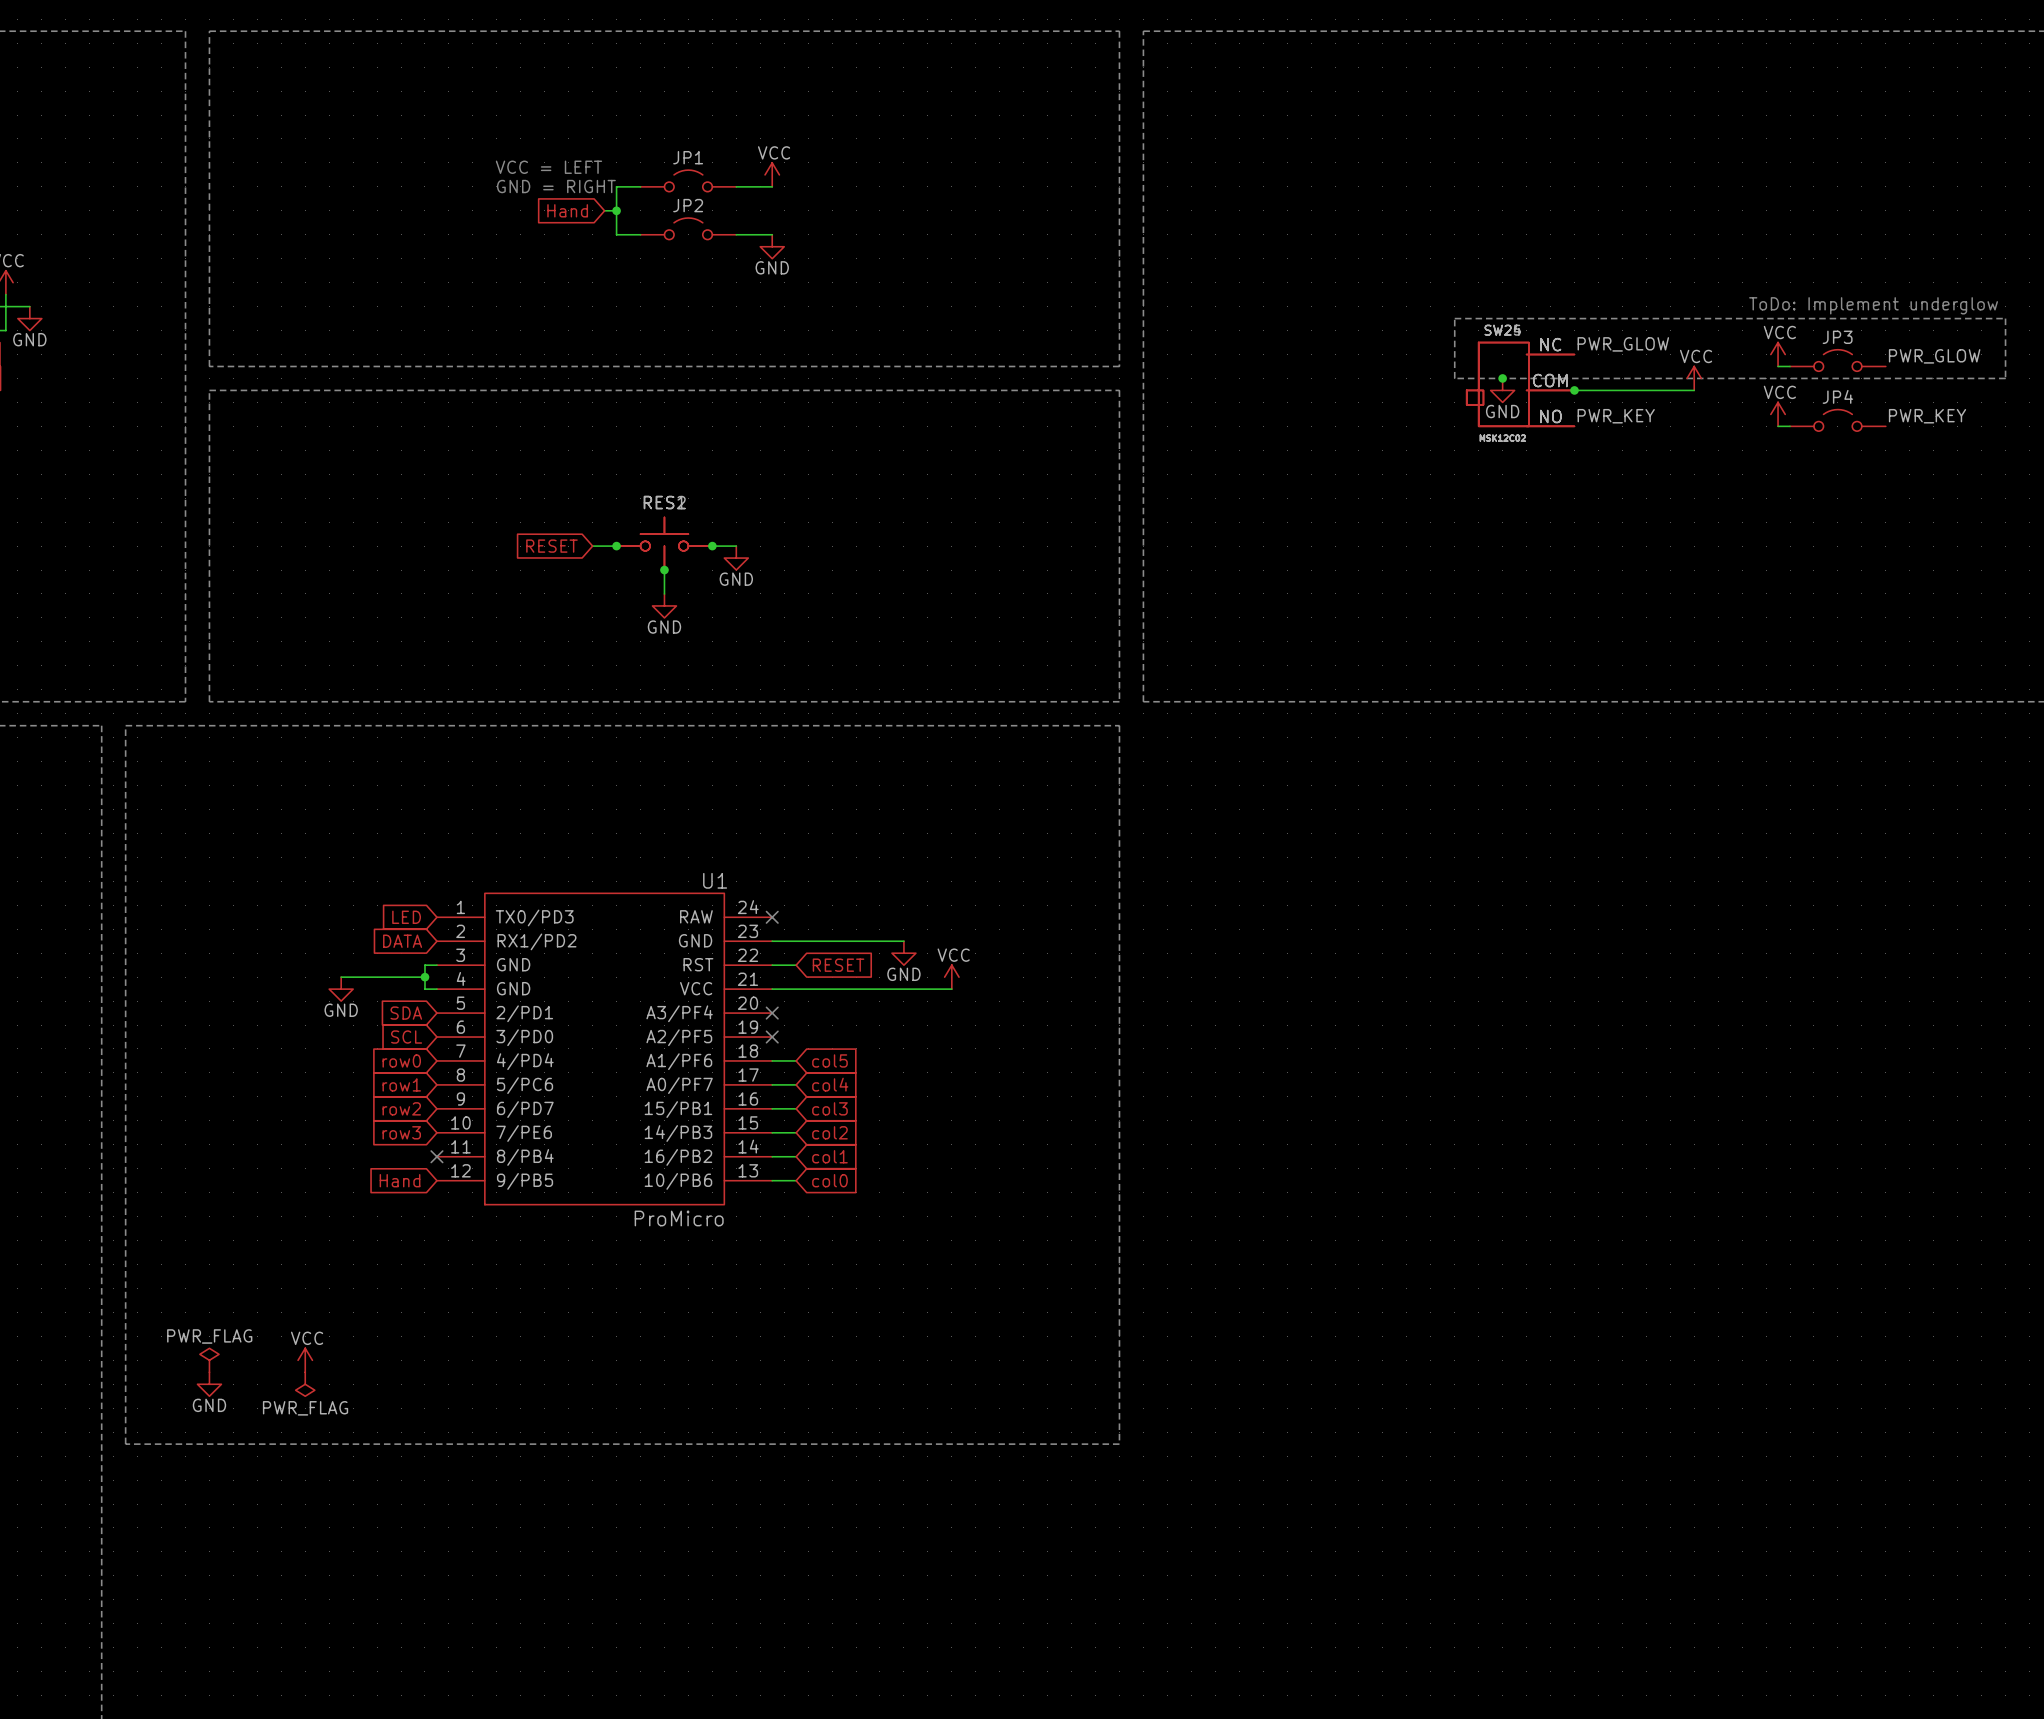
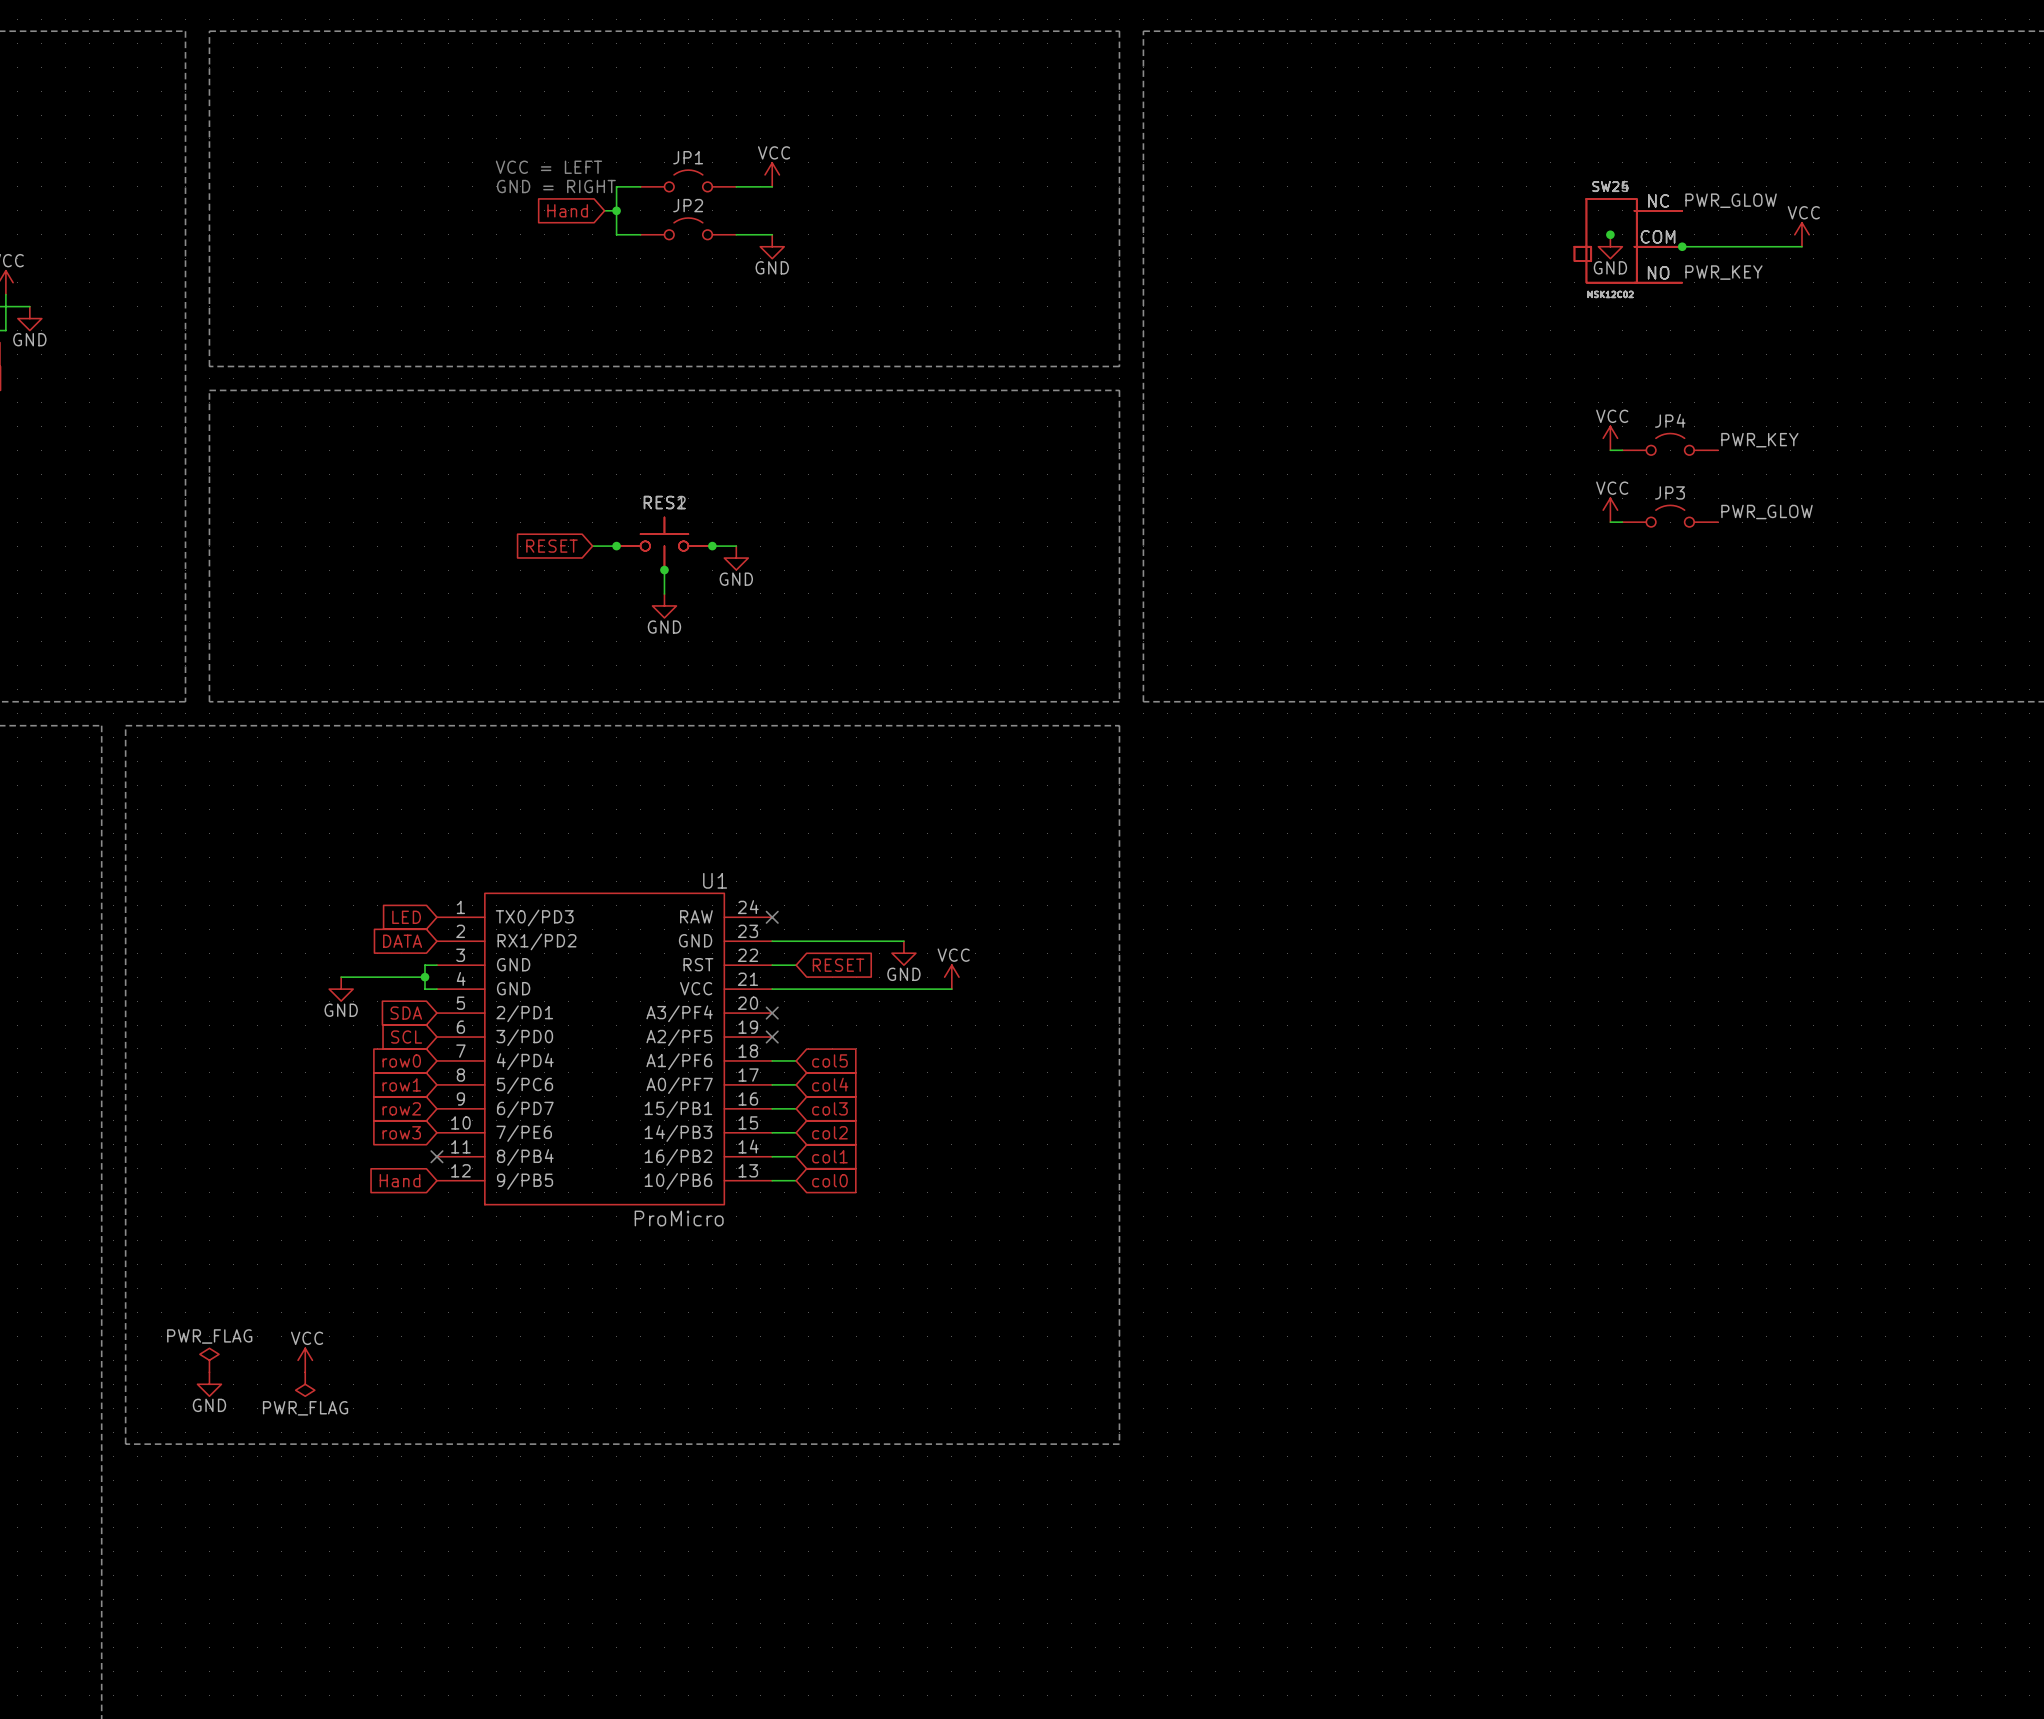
label: none -> PWR_GLOW (1731, 200)
junction: none -> (1610, 234)
power symbol: none -> VCC (1801, 234)
junction: none -> (1682, 246)
label: none -> PWR_KEY (1723, 272)
text: ToDo: Implement underglow (1873, 305) -> none
line: (1454, 318) (2005, 318) (2005, 378) (1454, 378) (1454, 318) -> none
label: PWR_GLOW (1623, 344) -> none
power symbol: VCC (1778, 354) -> none
label: PWR_GLOW (1934, 356) -> none
JP3 position: (1837, 360) -> (1670, 516)
wire: (1778, 366) (1790, 366) -> (1610, 522) (1622, 522)
junction: (1502, 378) -> none
power symbol: VCC (1694, 378) -> none
part position: (1520, 384) -> (1628, 240)
part position: (1520, 384) -> (1628, 240)
power symbol position: GND (1502, 390) -> GND (1610, 246)
wire: (1574, 390) (1694, 390) -> (1682, 246) (1801, 246)
junction: (1574, 390) -> none
power symbol: VCC (1778, 414) -> none
label: PWR_KEY (1616, 416) -> none
label: PWR_KEY (1927, 416) -> none
JP4 position: (1837, 420) -> (1670, 444)
wire: (1778, 426) (1790, 426) -> (1610, 450) (1622, 450)
power symbol: none -> VCC (1610, 438)
label: none -> PWR_KEY (1759, 440)
power symbol: none -> VCC (1610, 510)
label: none -> PWR_GLOW (1767, 512)

